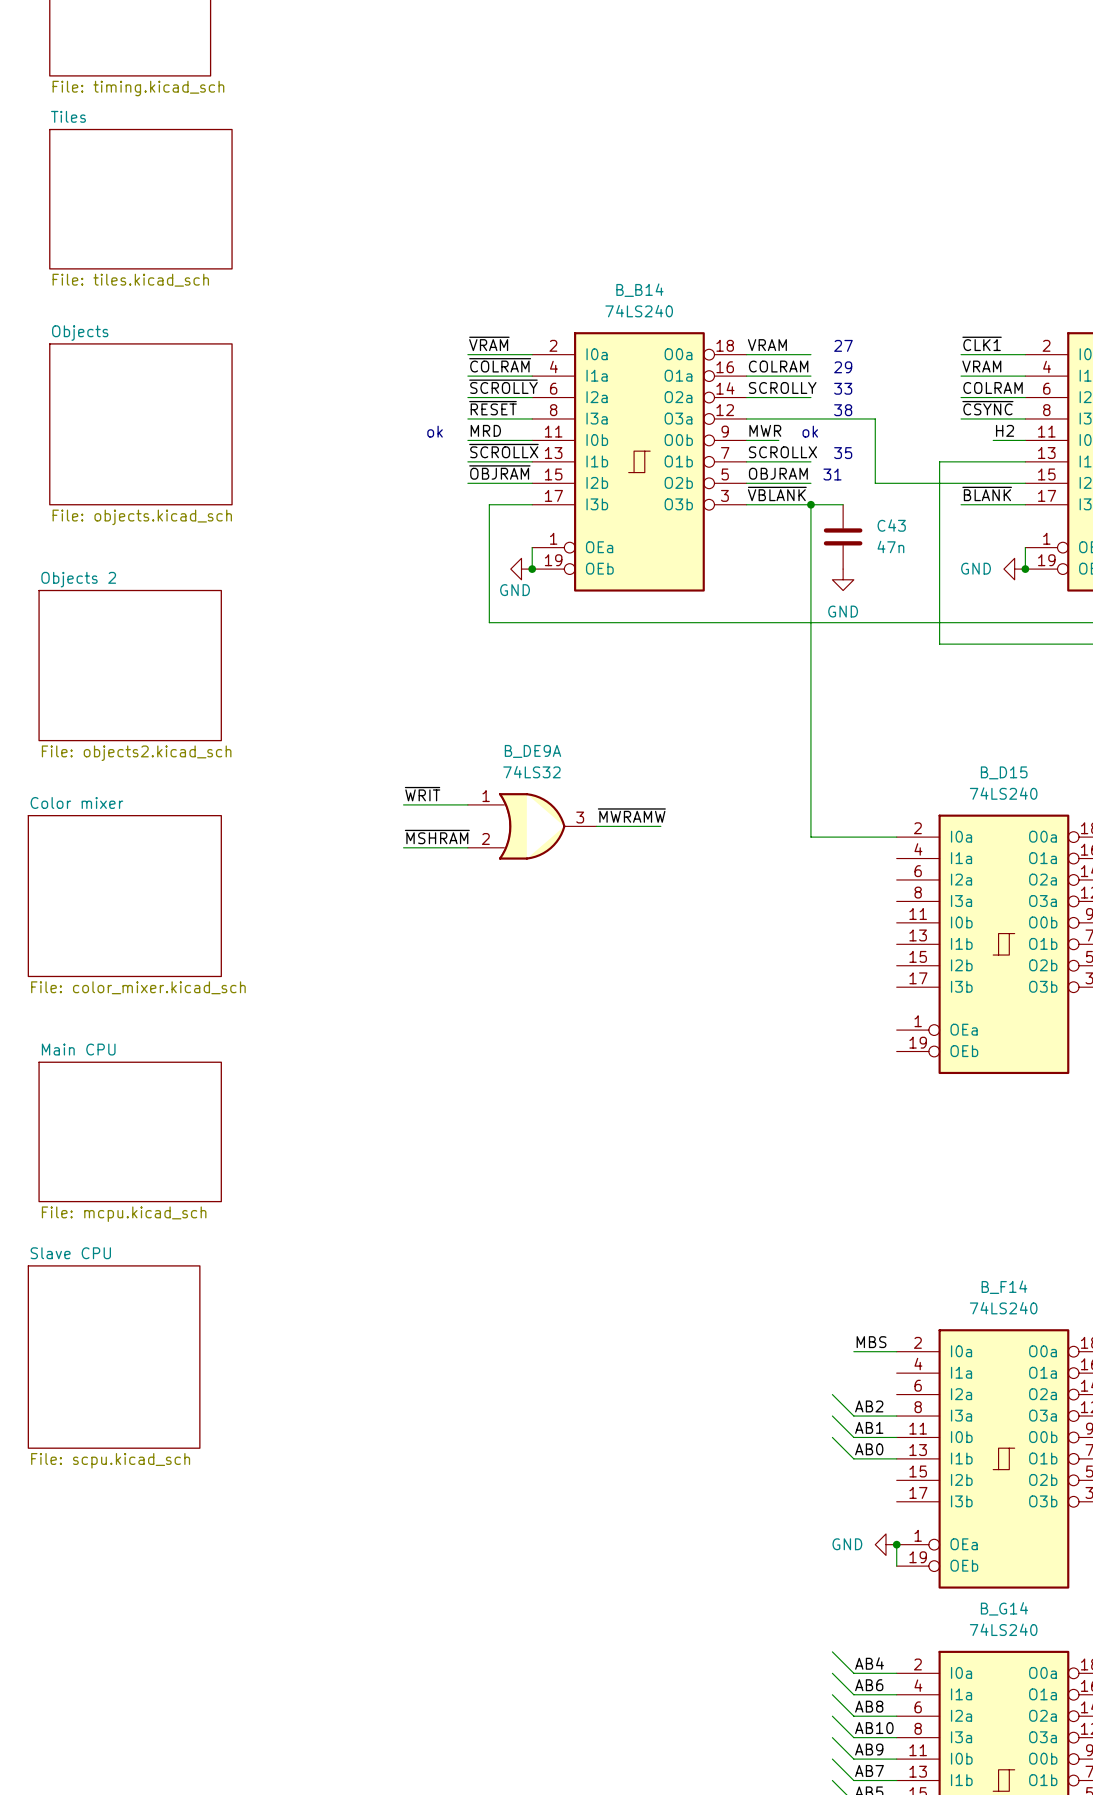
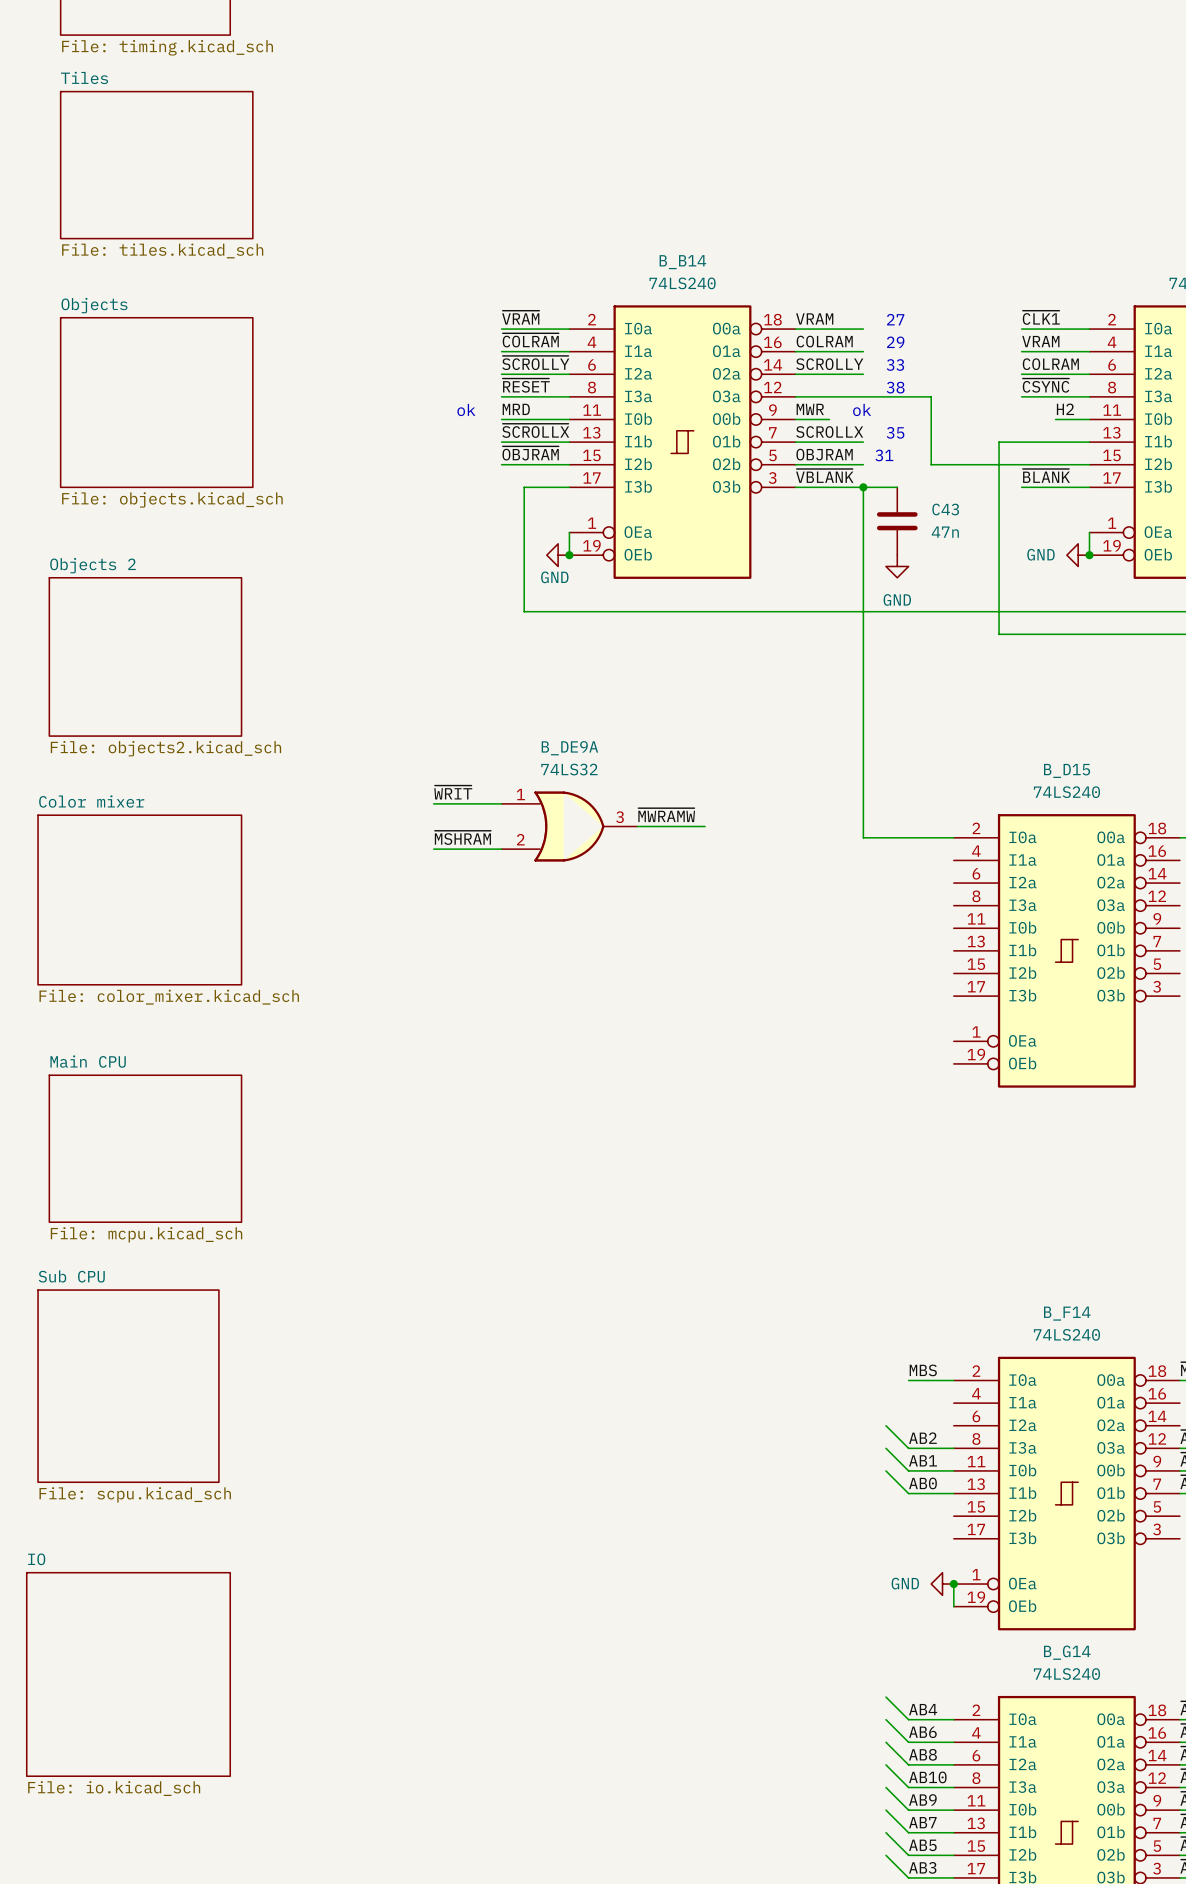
sheet Slave CPU name: Slave CPU (70, 1253) -> Sub CPU (71, 1276)
sheet IO: none -> File: io.kicad_sch (128, 1674)

